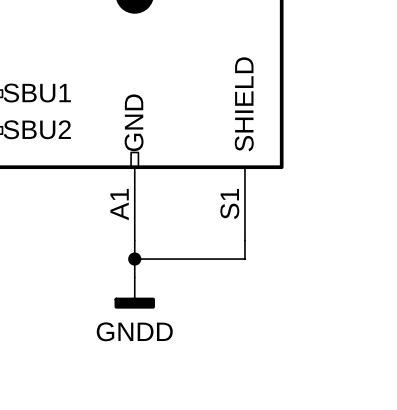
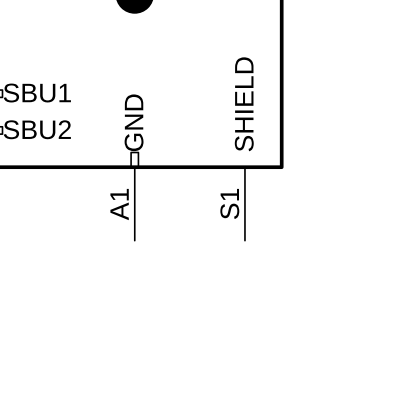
wire: (134, 240) (134, 277) -> none
wire: (244, 240) (244, 259) (134, 259) -> none
junction: (134, 259) -> none
power symbol: GNDD (134, 293) -> none

